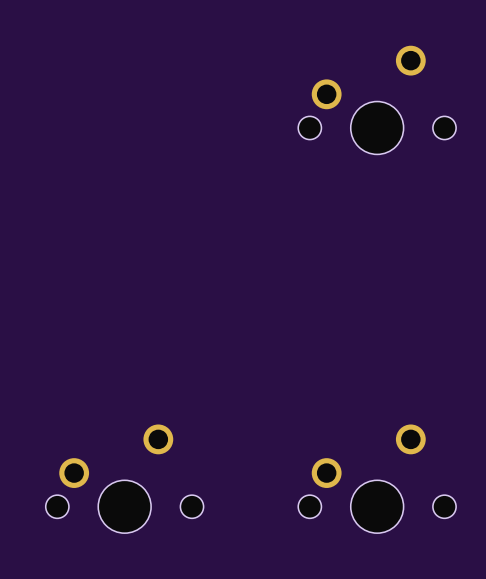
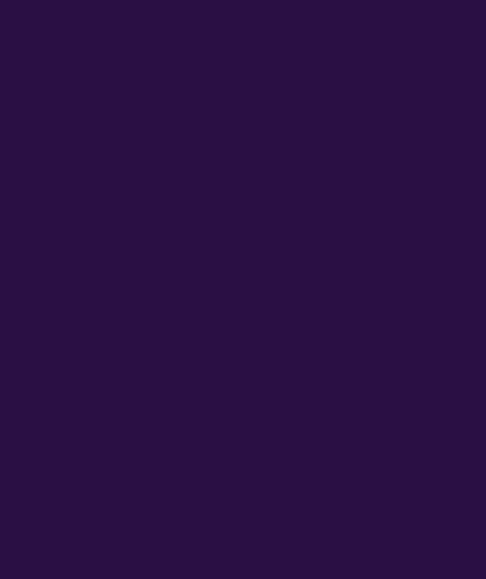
part: (377, 100) -> none
part: (124, 478) -> none
part: (377, 478) -> none

